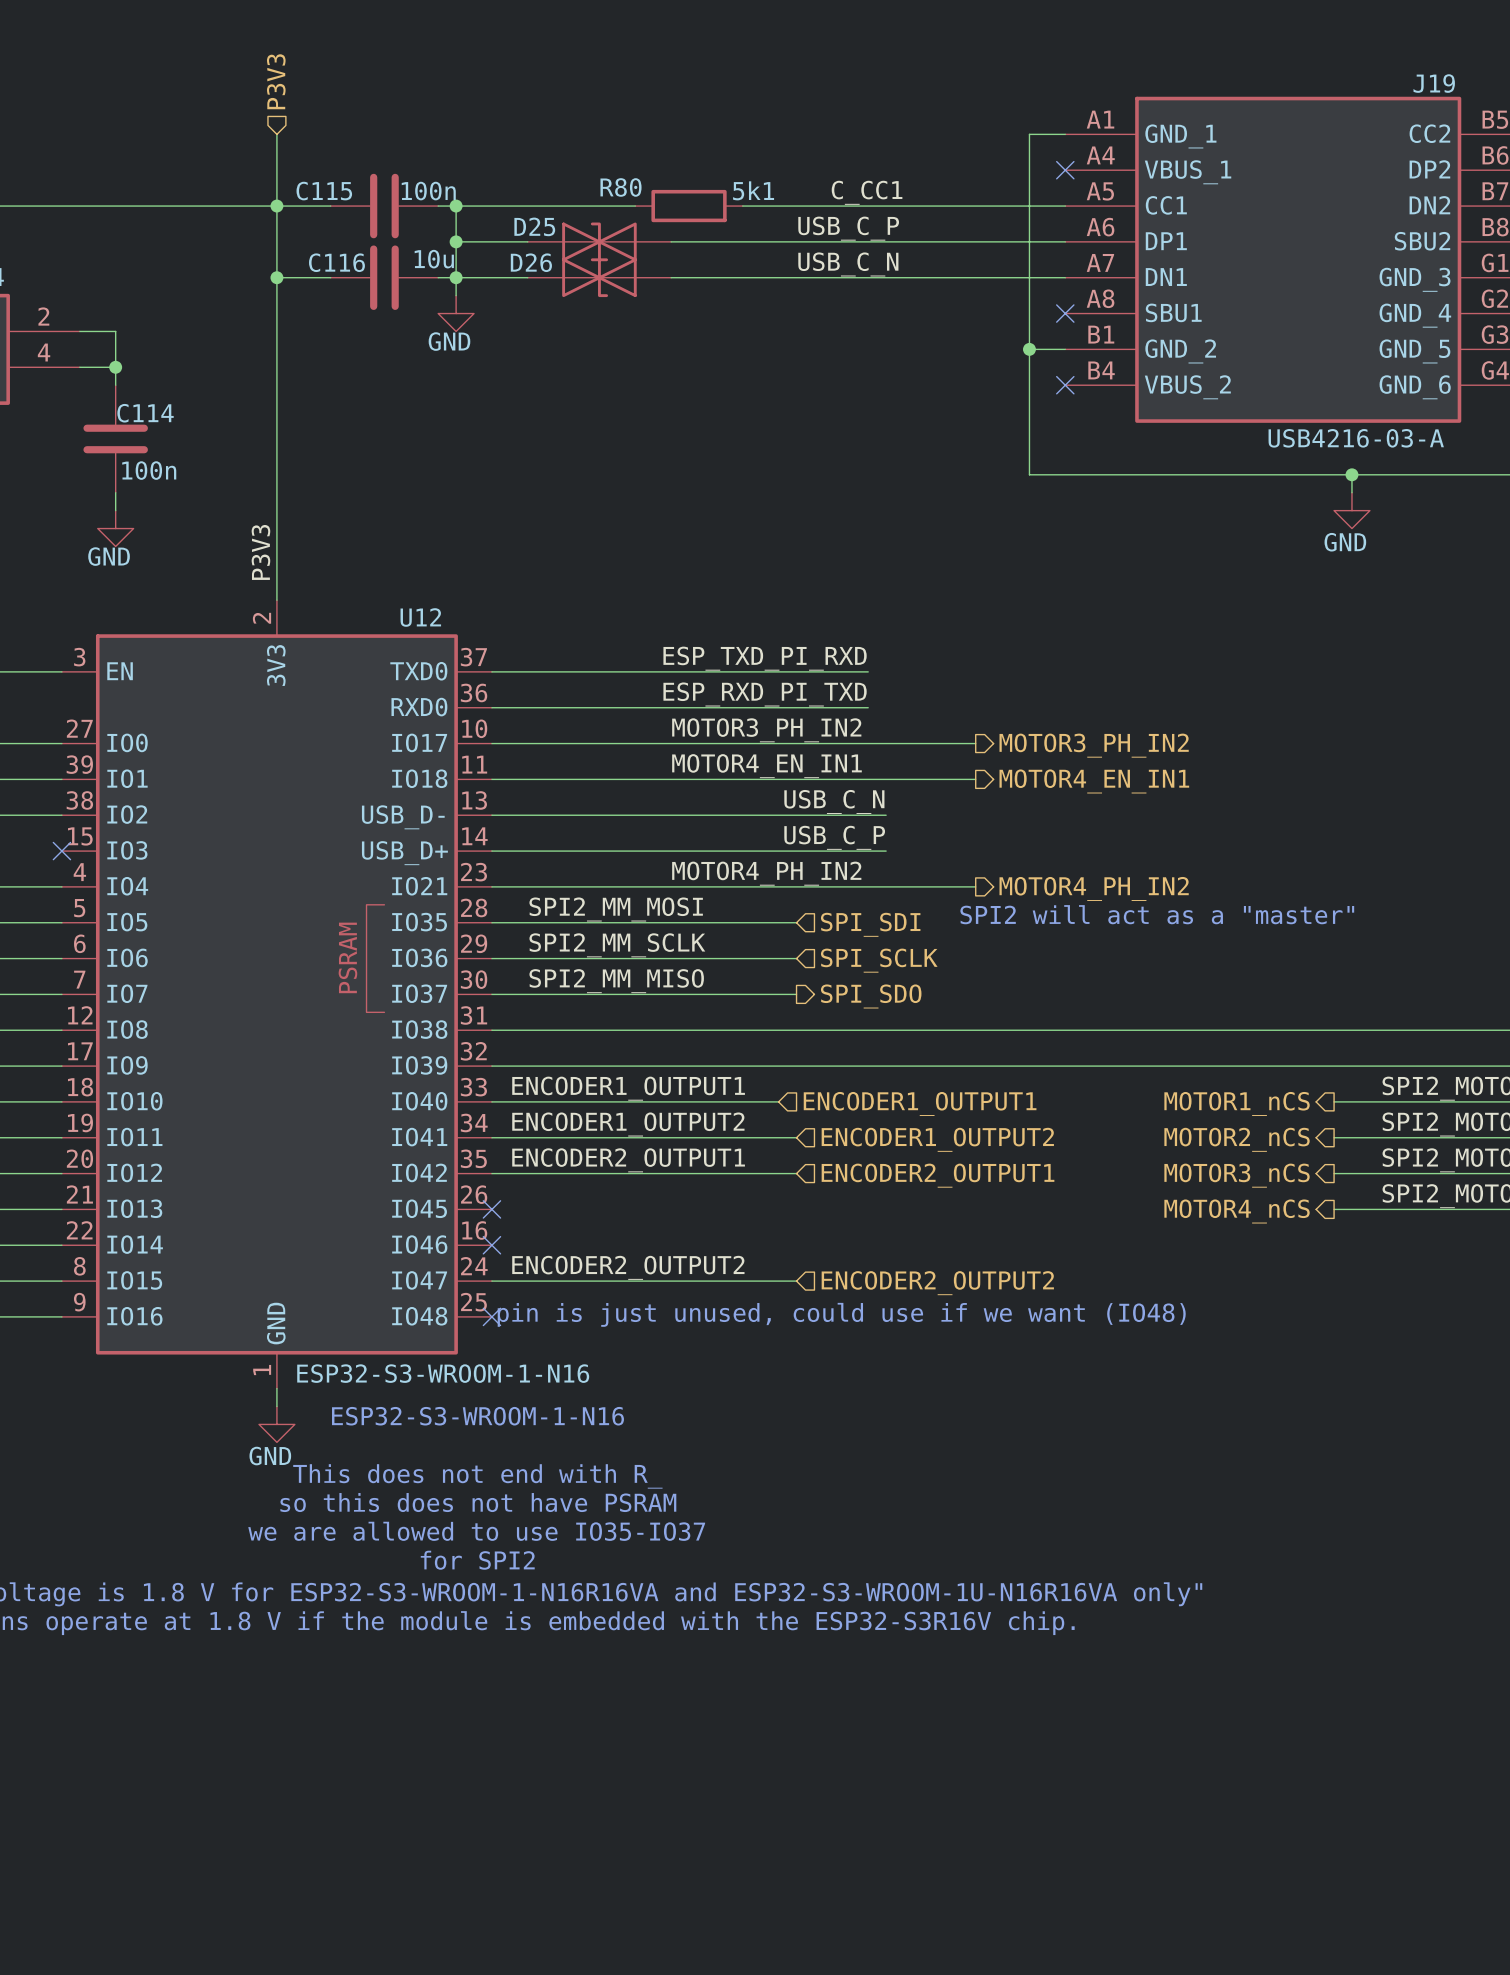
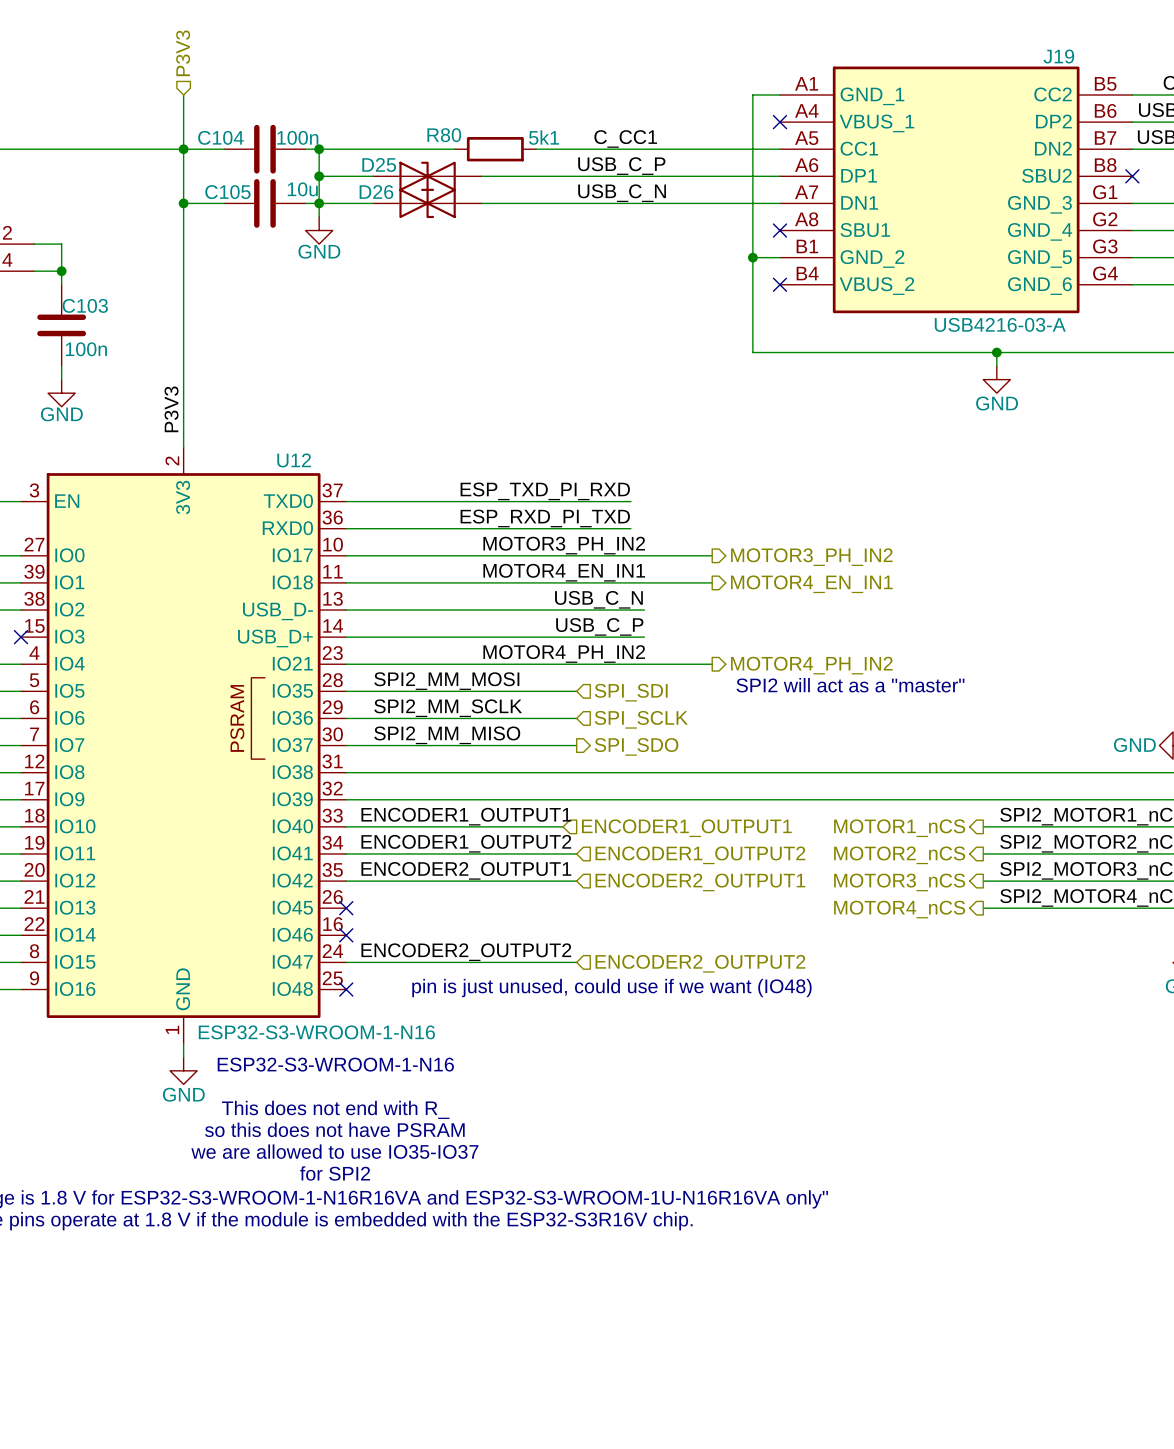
C115 name: C115 (324, 191) -> C104 (220, 137)
C116 name: C116 (336, 262) -> C105 (227, 192)
C114 name: C114 (145, 413) -> C103 (85, 305)

